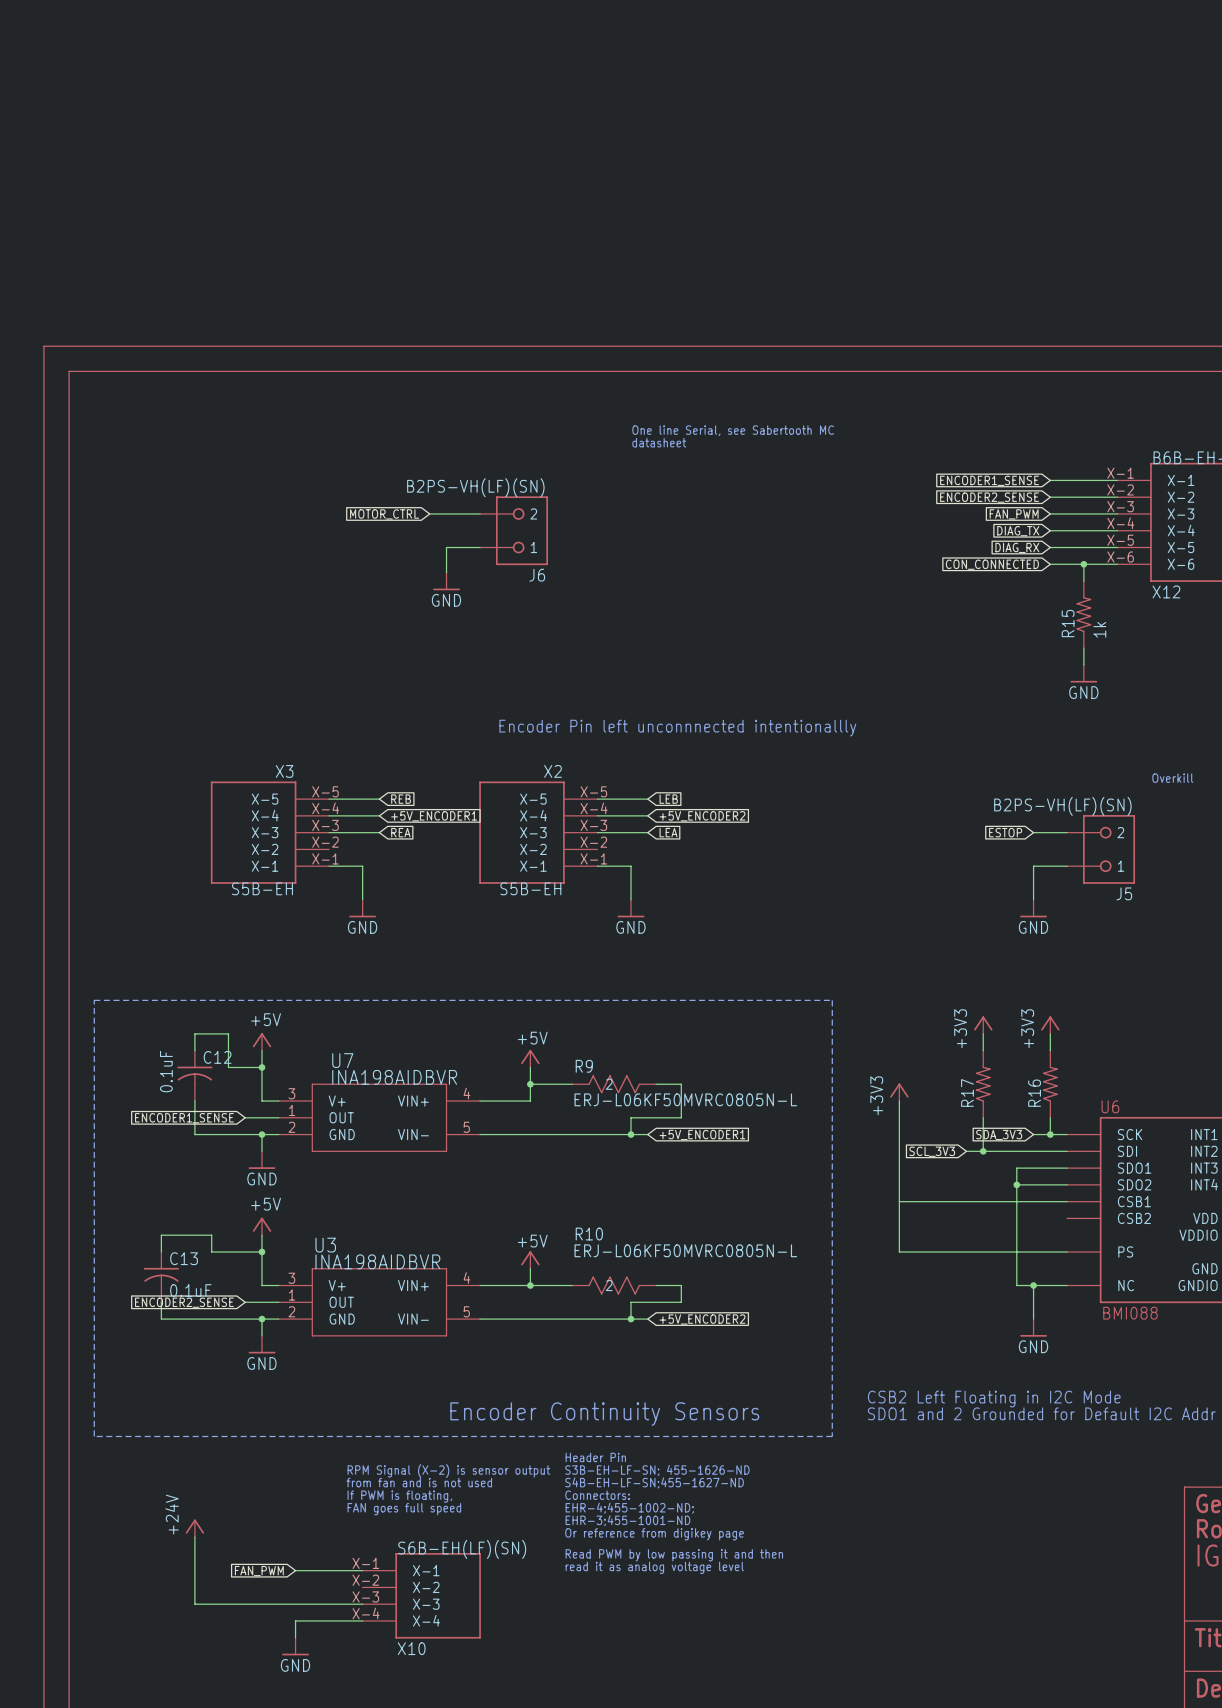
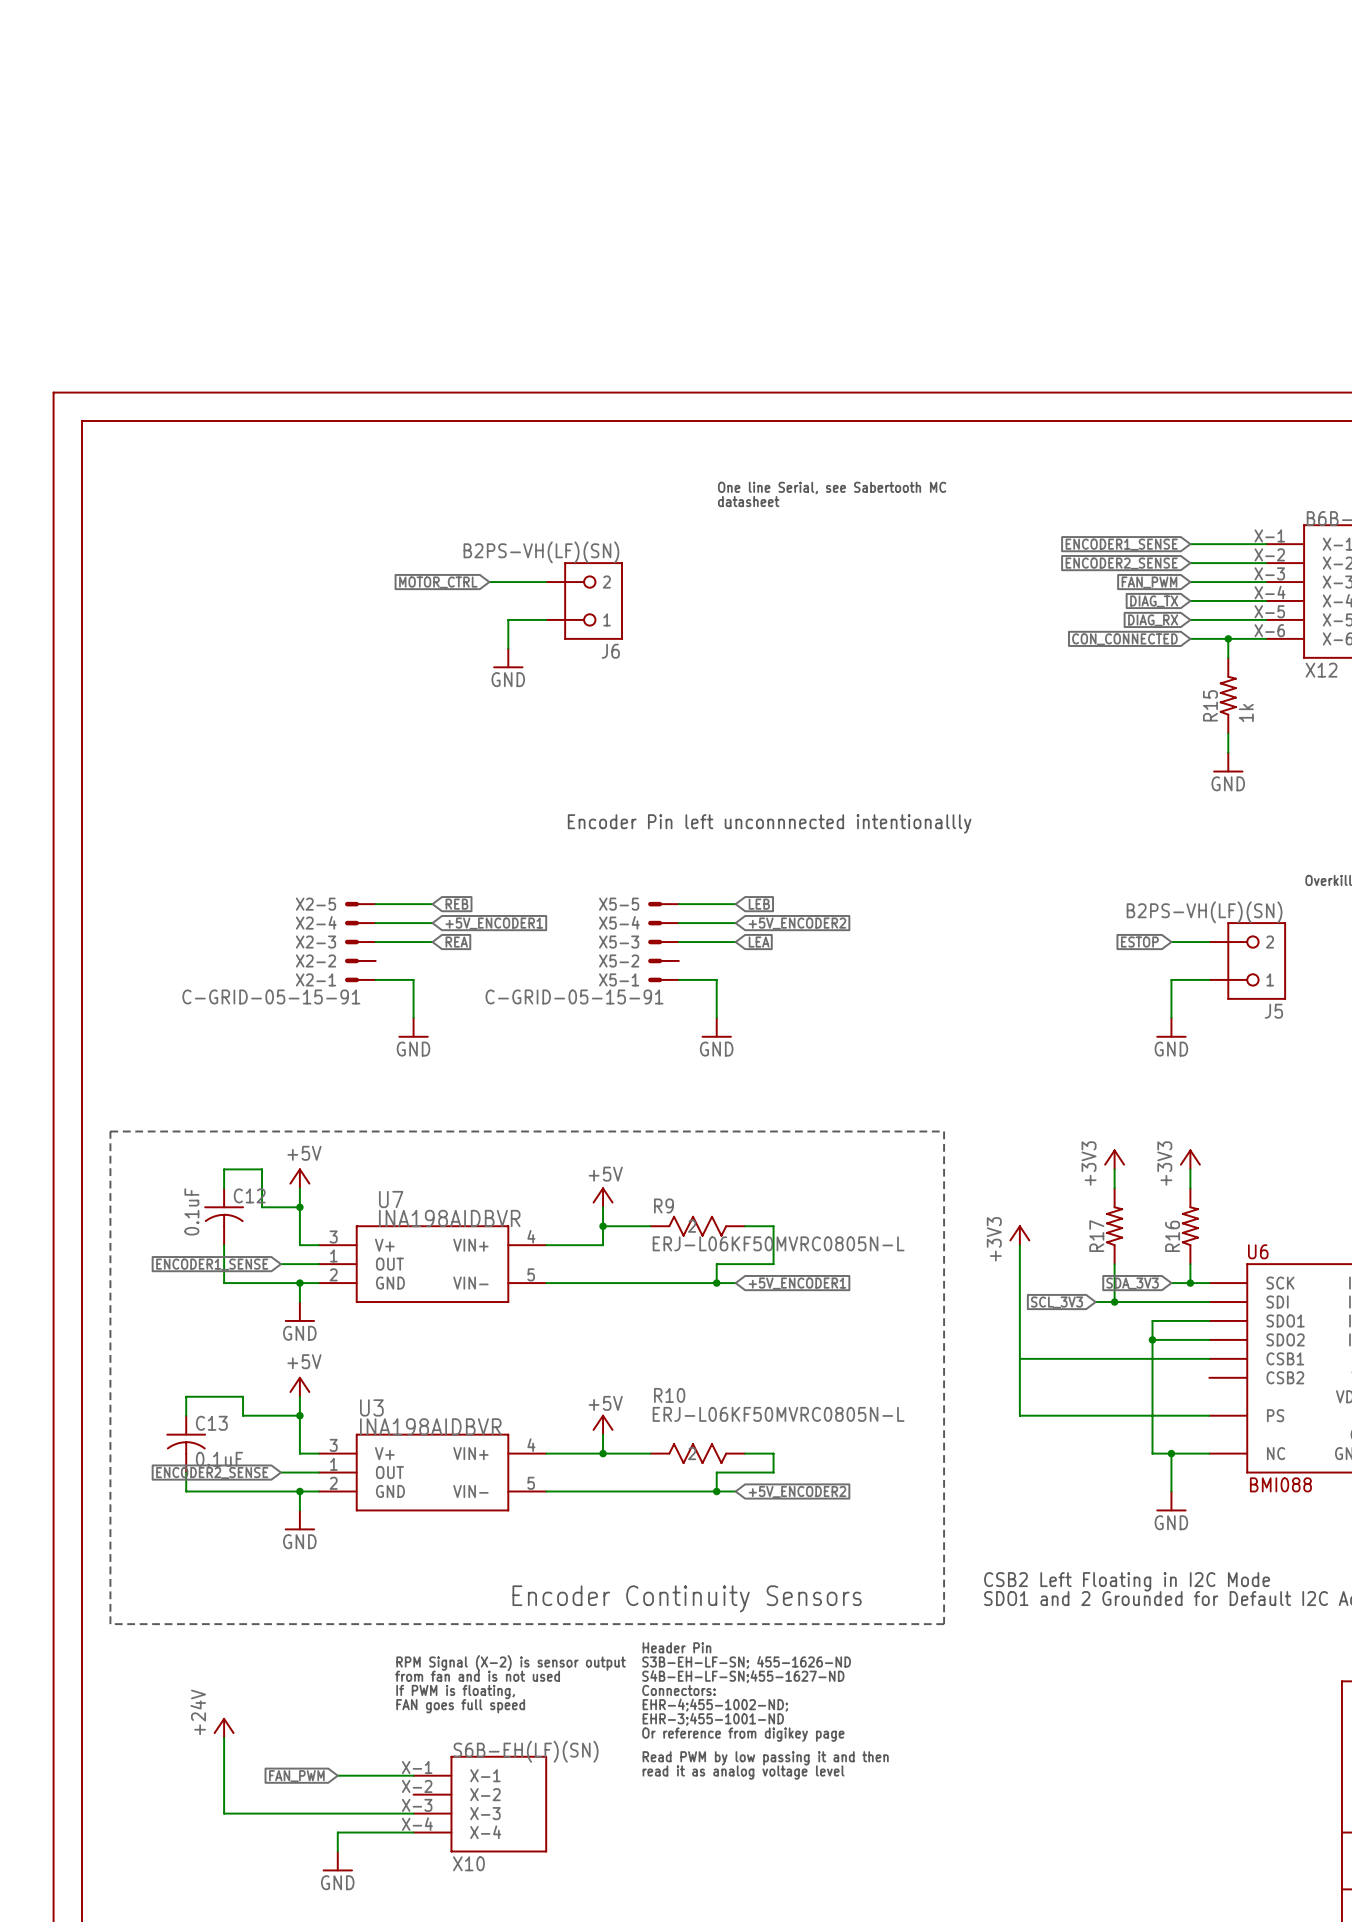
X2-5: none -> (360, 904)
X5-5: none -> (663, 904)
X2-4: none -> (360, 923)
X5-4: none -> (663, 923)
X3: S5B-EH (269, 832) -> none
X2-3: none -> (360, 942)
X2: S5B-EH (538, 832) -> none
X5-3: none -> (663, 942)
X2-2: none -> (360, 960)
X5-2: none -> (663, 960)
X2-1: none -> C-GRID-05-15-91 (360, 979)
X5-1: none -> C-GRID-05-15-91 (663, 979)

